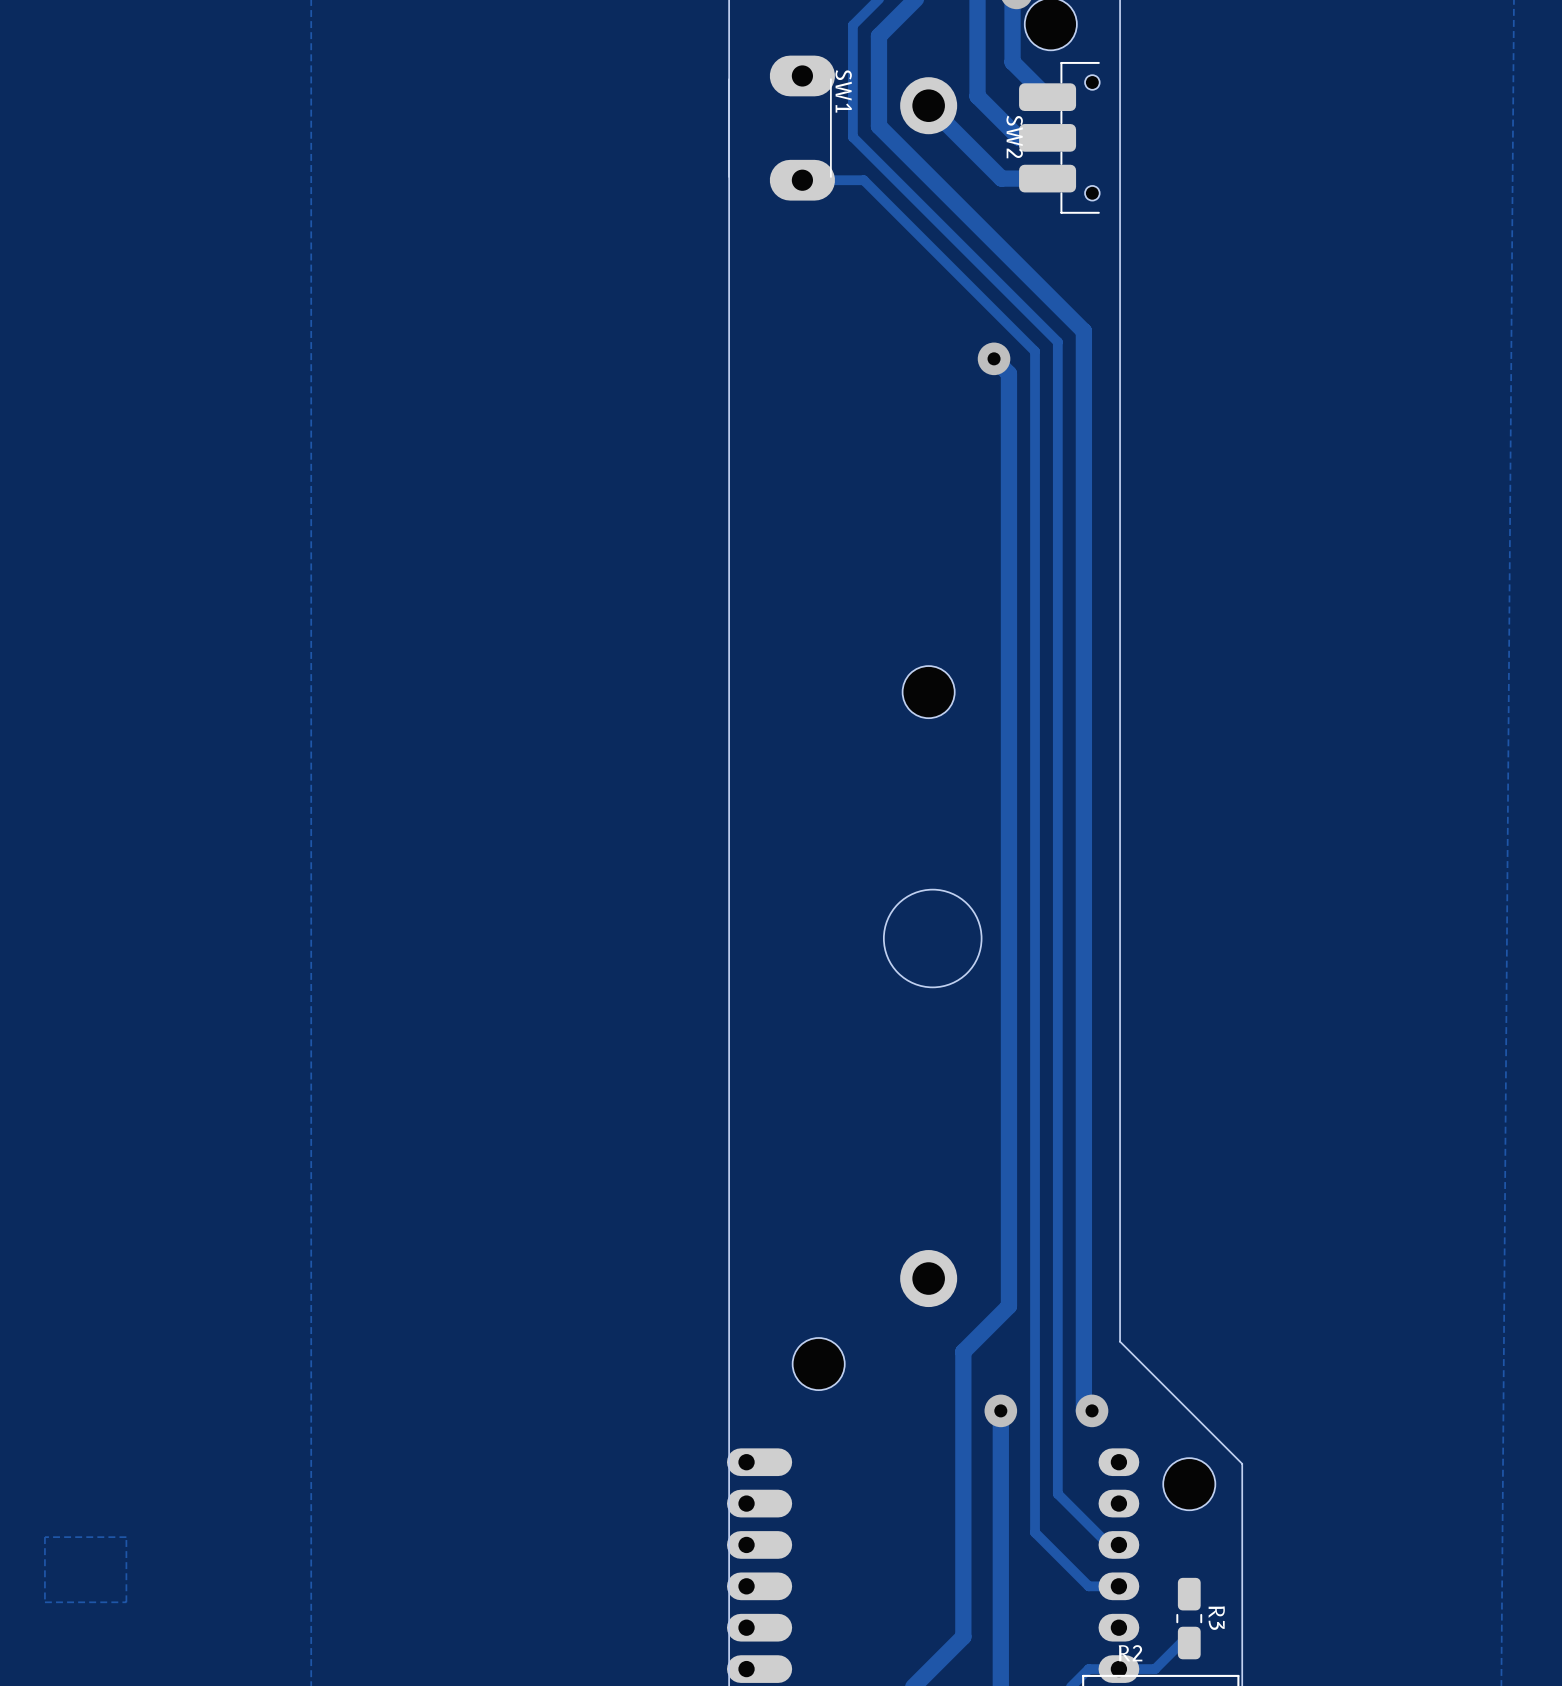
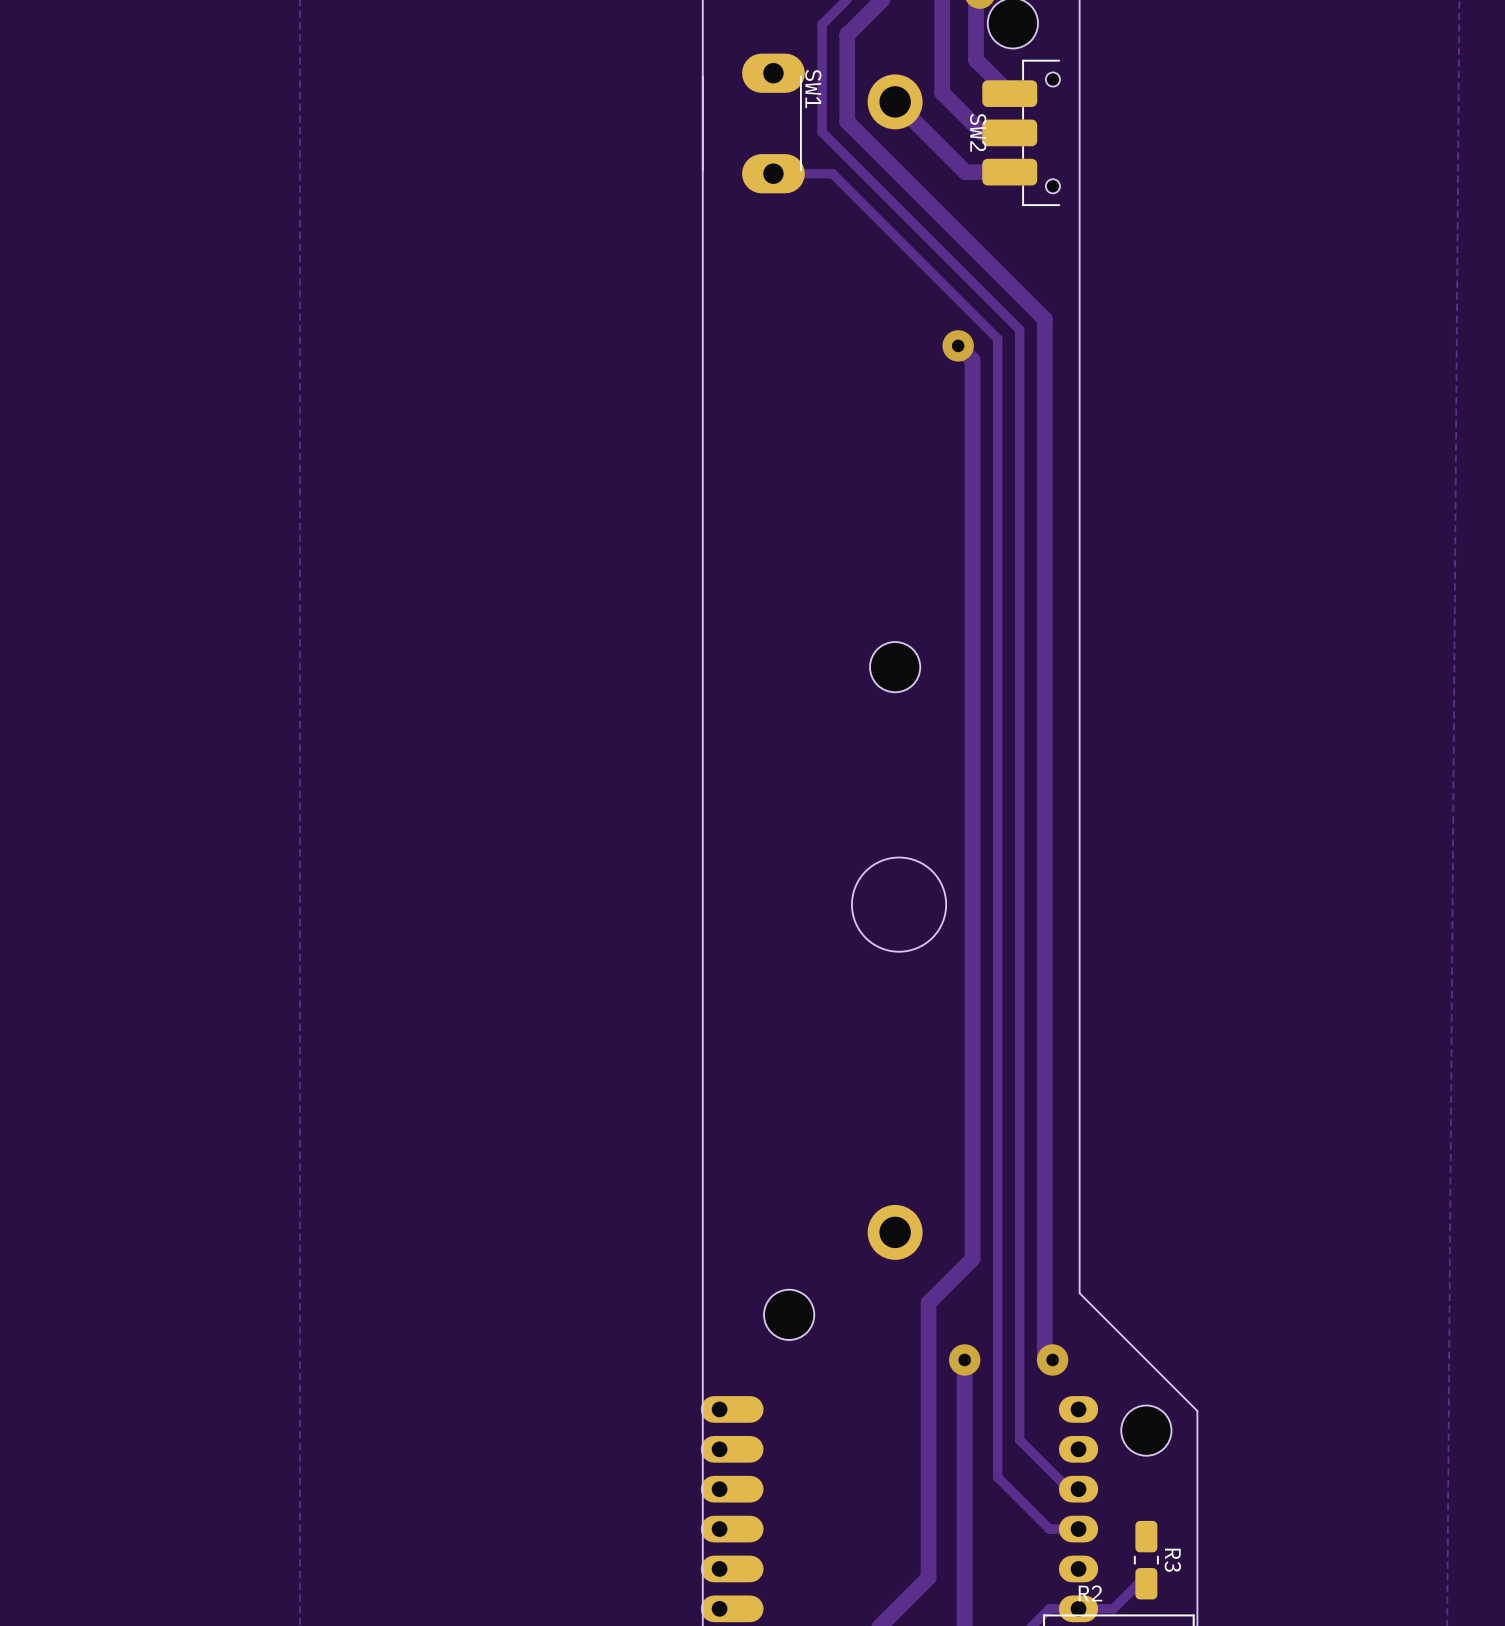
zone outline: (126, 1537) (44, 1537) (44, 1602) (126, 1602) (126, 1537) -> none

